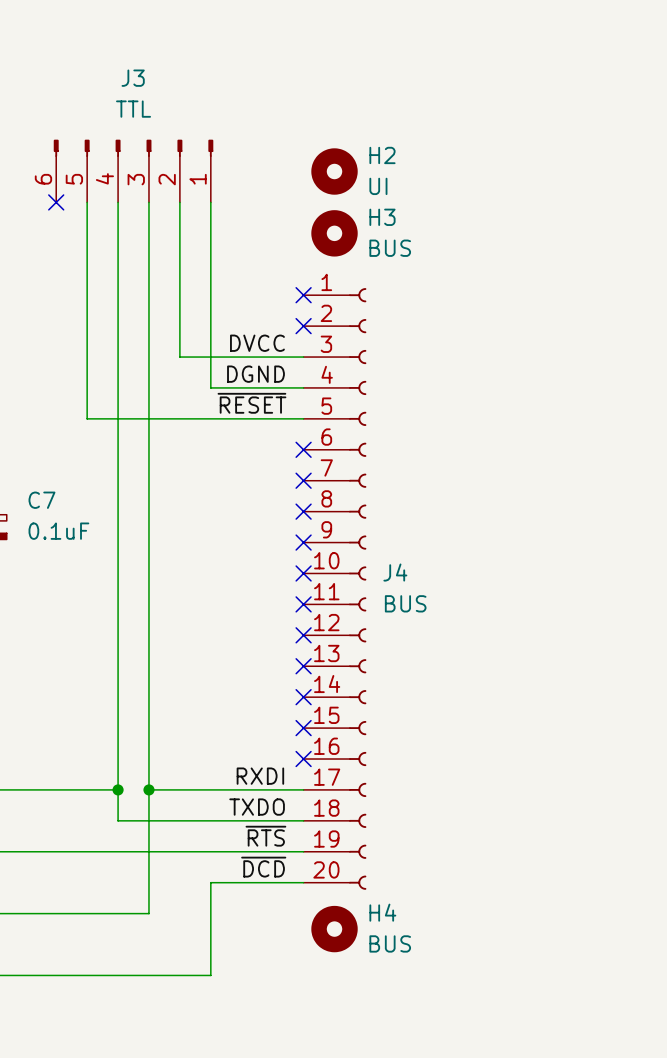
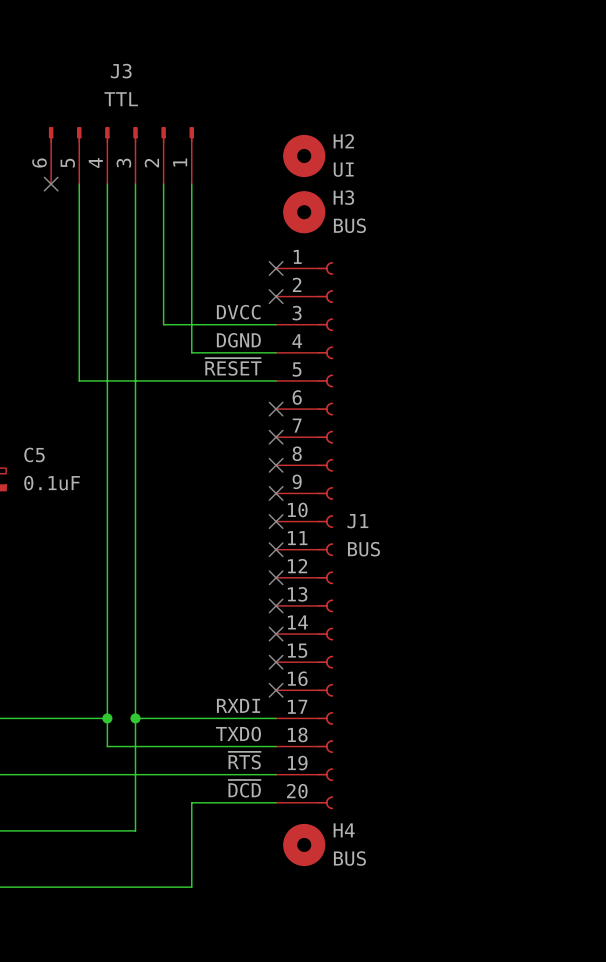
C7 name: C7 (41, 500) -> C5 (34, 454)
J4 name: J4 (395, 572) -> J1 (357, 521)

